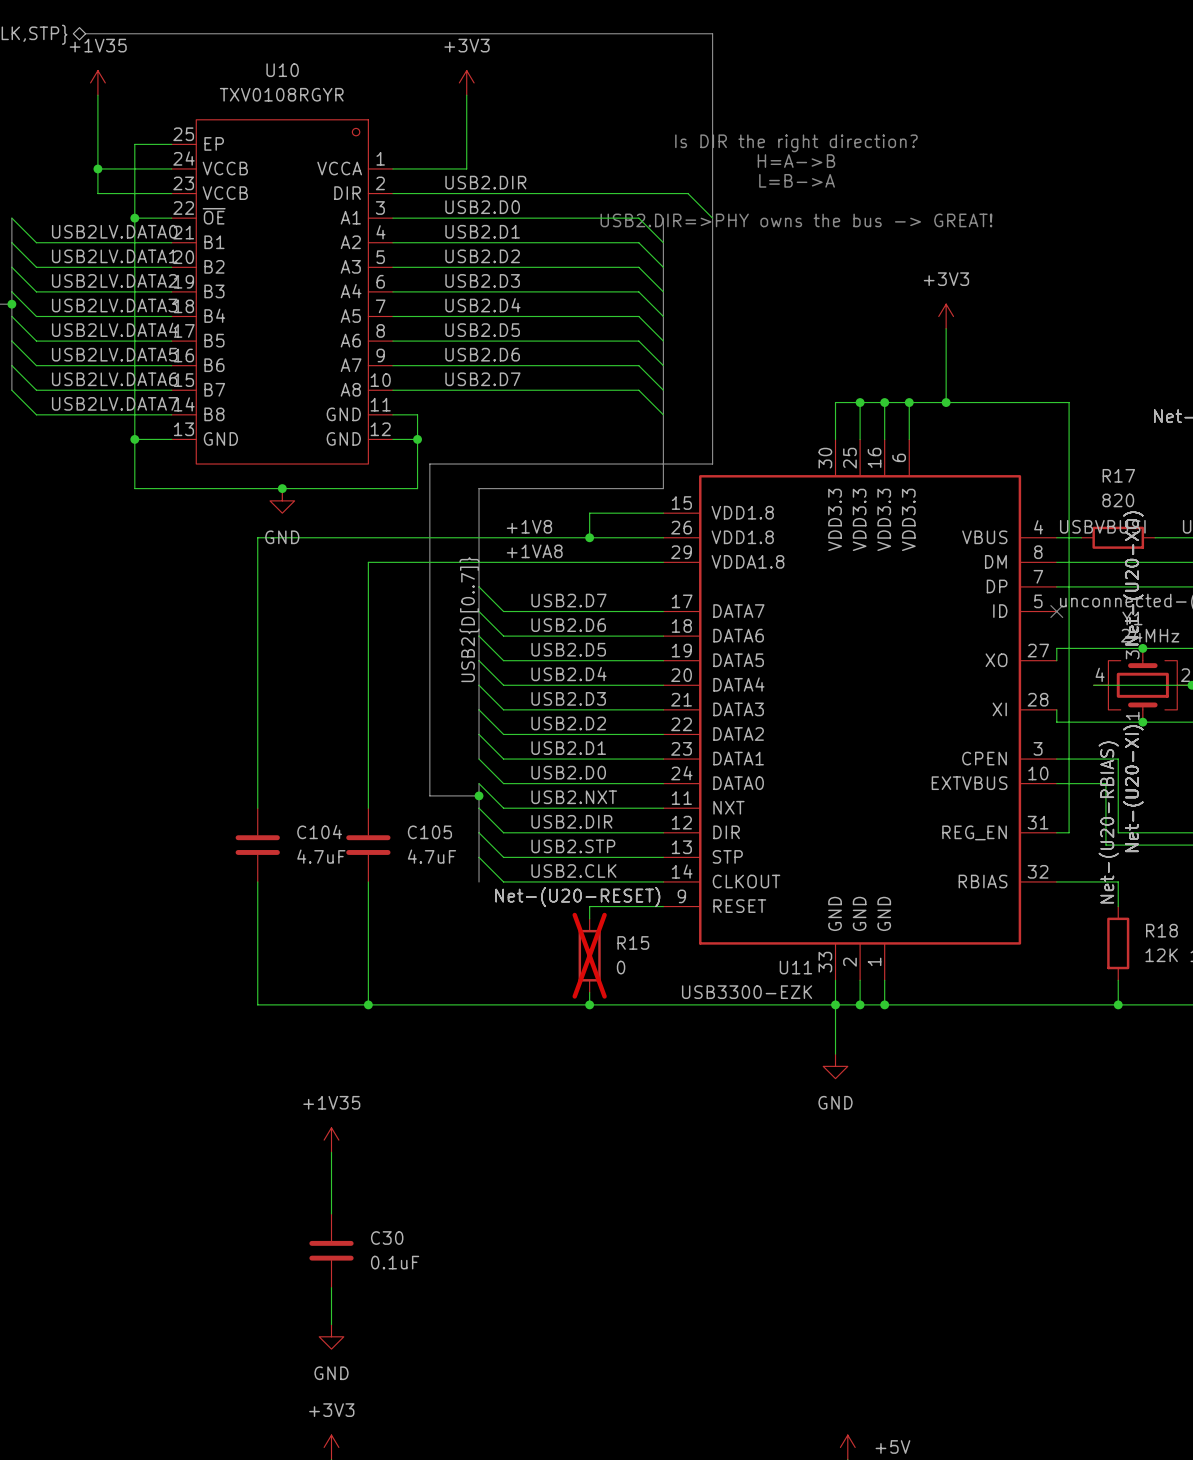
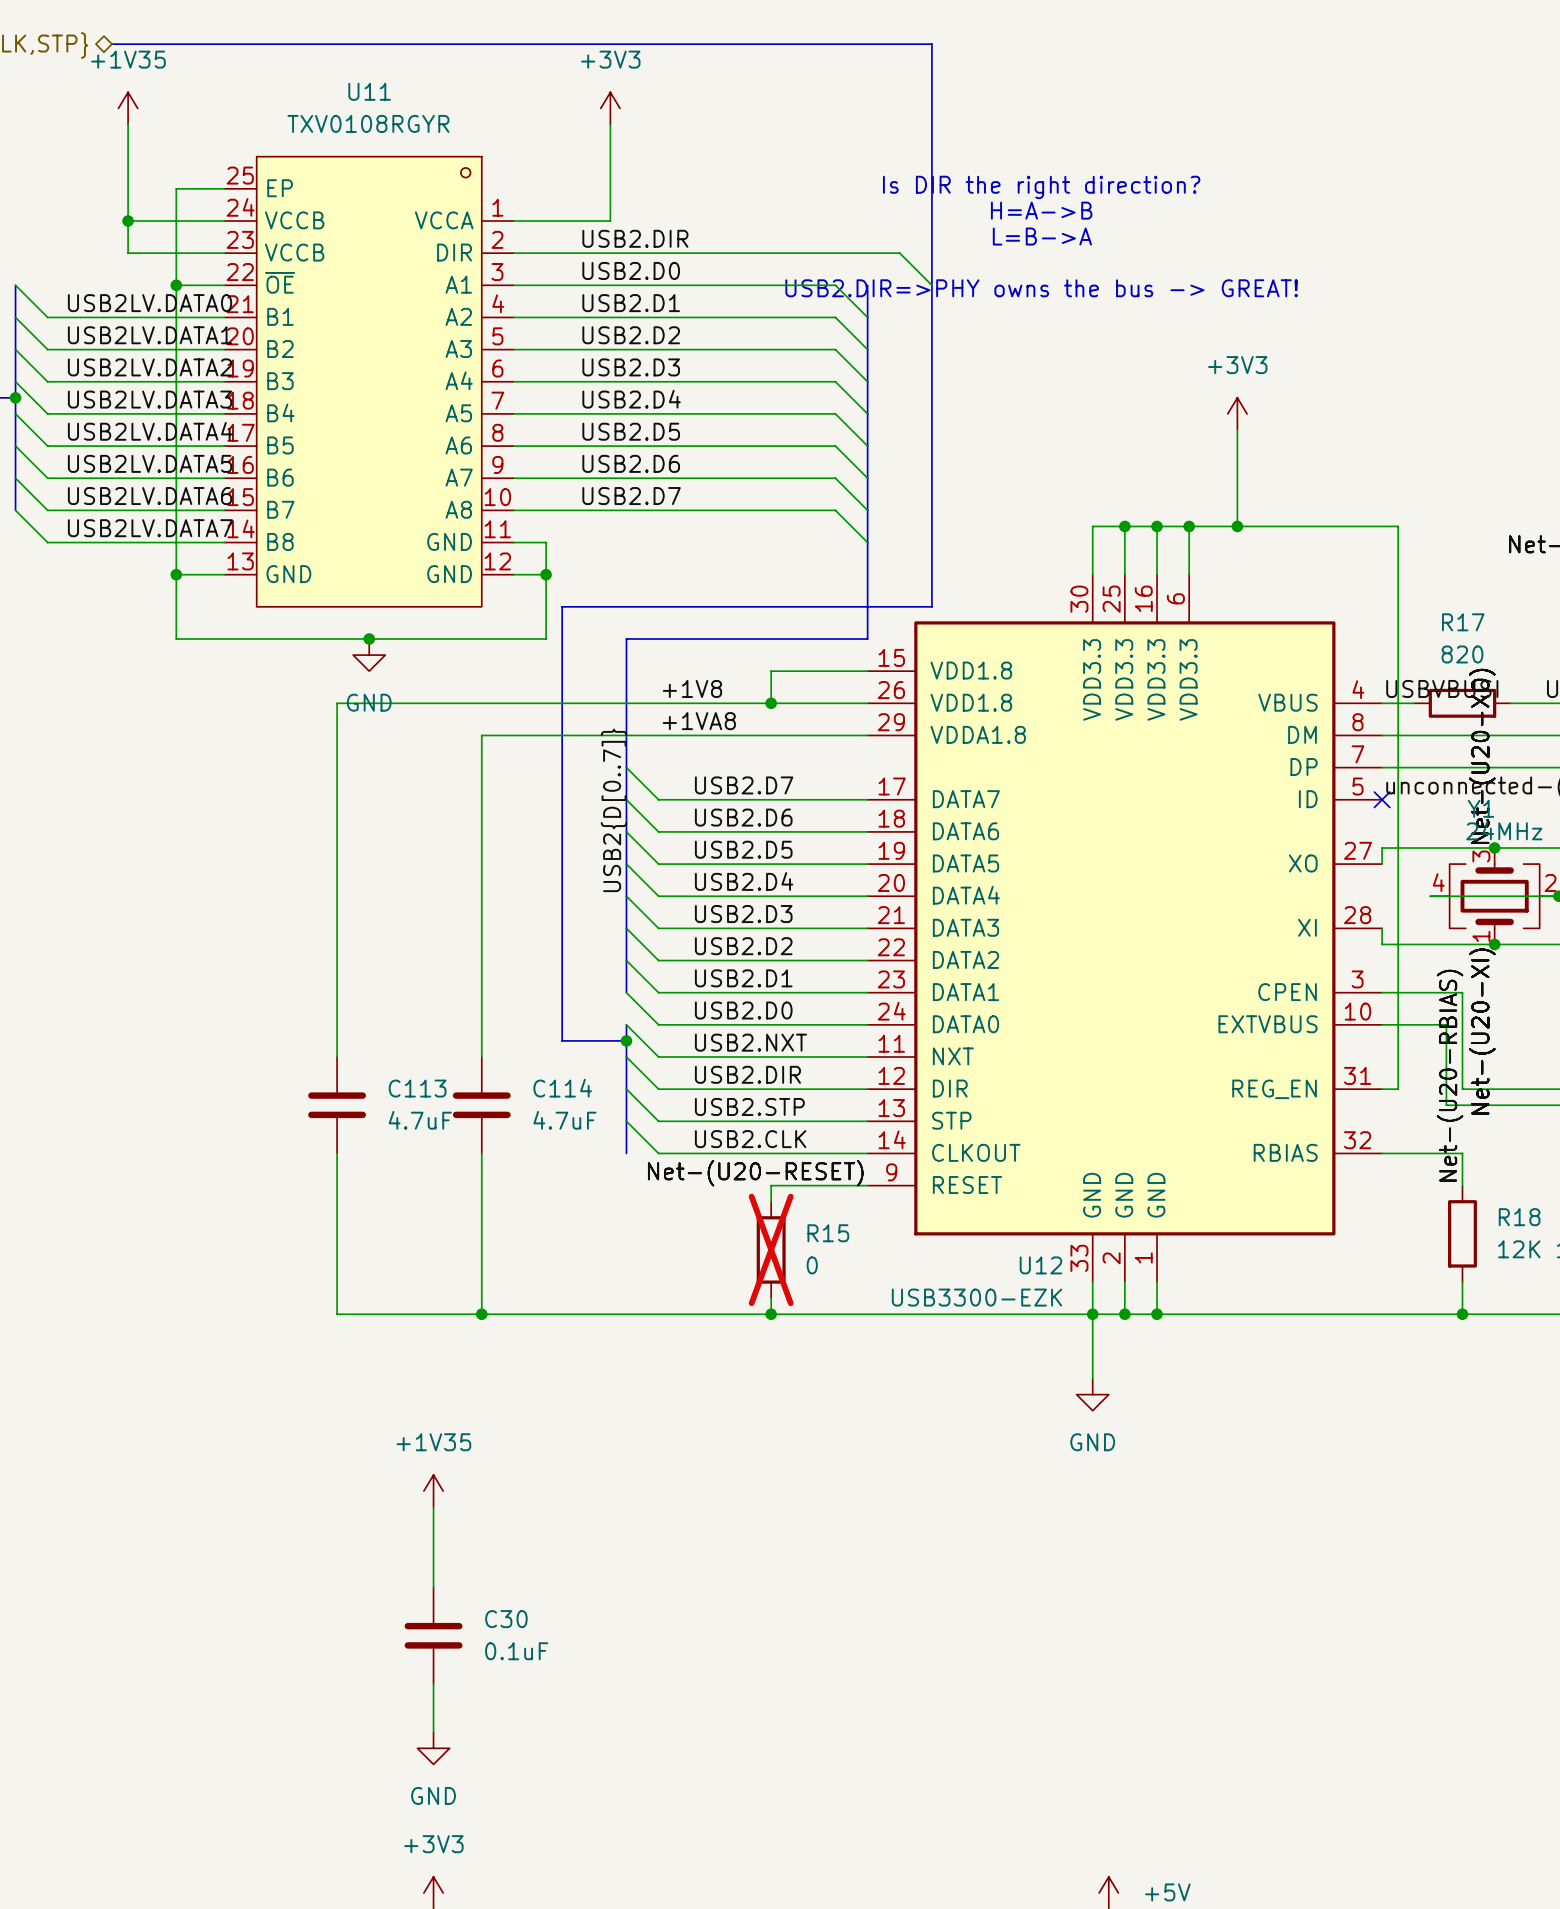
U10 name: U10 (282, 70) -> U11 (369, 91)
C104 name: C104 (319, 832) -> C113 (417, 1088)
C105 name: C105 (429, 832) -> C114 (562, 1088)
U11 name: U11 (795, 967) -> U12 (1040, 1265)

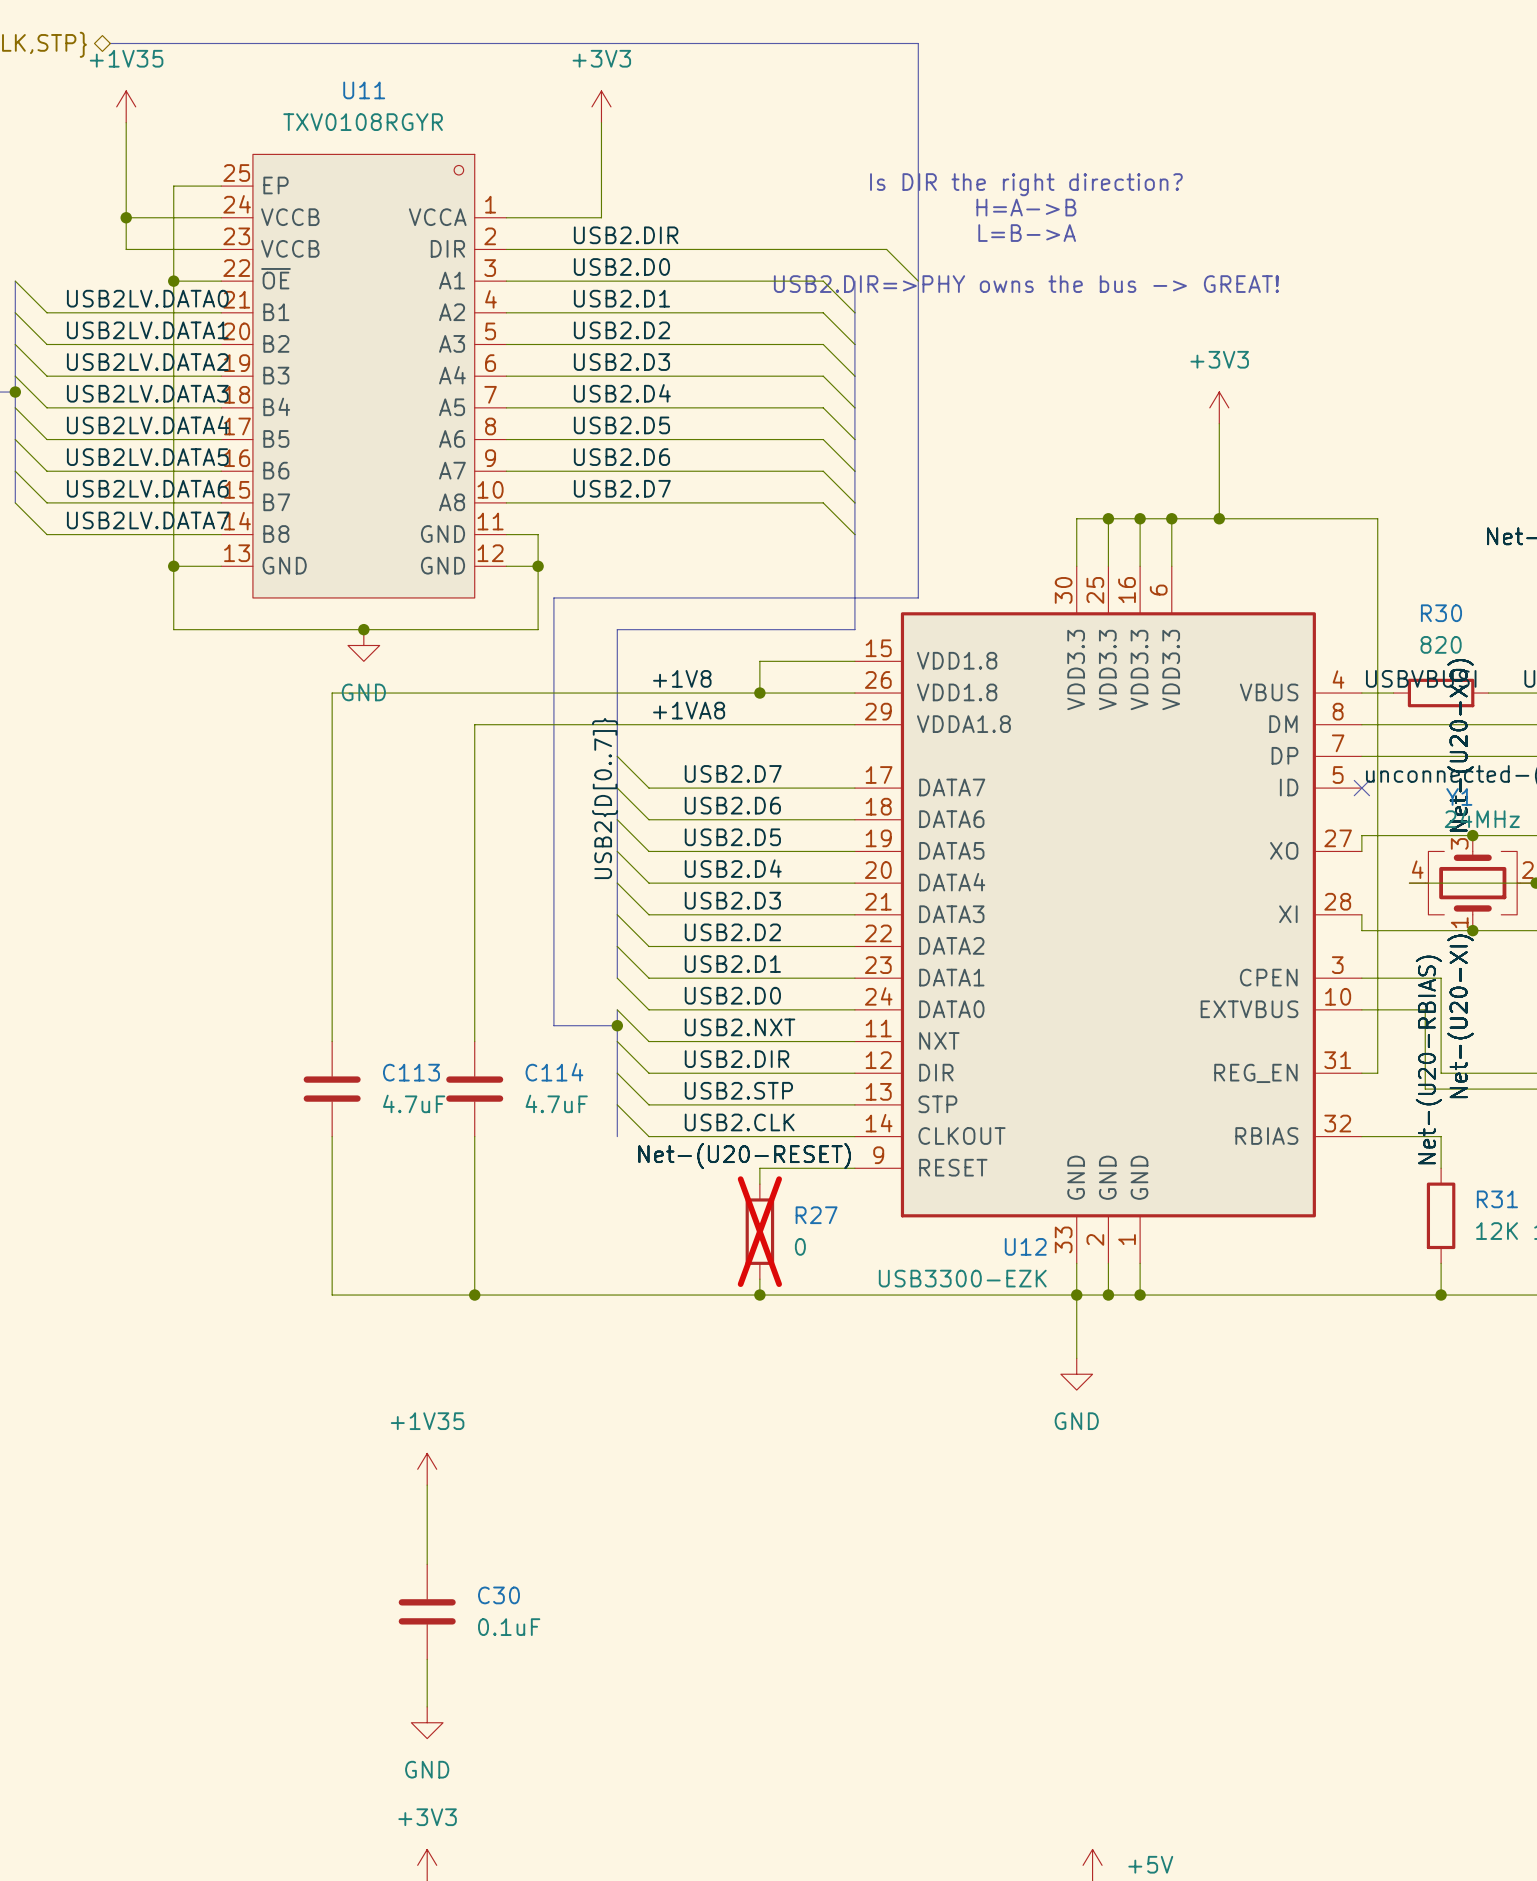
R17 name: R17 (1463, 622) -> R30 (1441, 613)
R18 name: R18 (1519, 1217) -> R31 (1497, 1199)
R15 name: R15 (828, 1233) -> R27 (816, 1215)

